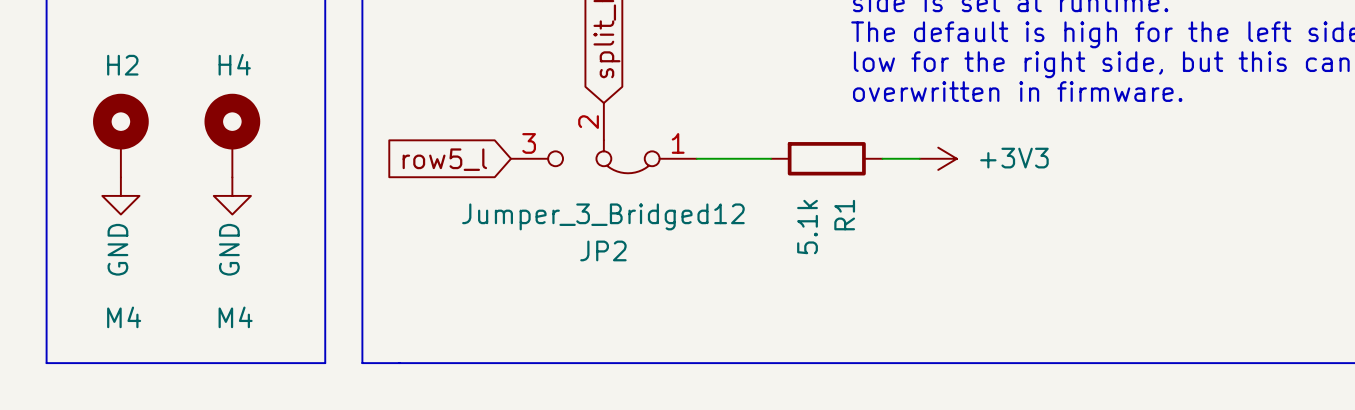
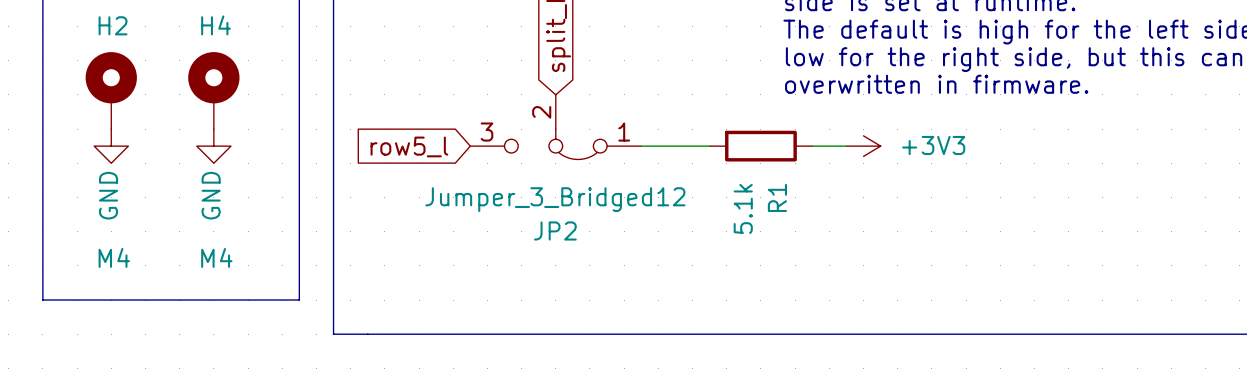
H2 position: (120, 135) -> (111, 90)
H4 position: (232, 135) -> (213, 90)
power symbol position: GND (120, 195) -> GND (111, 146)
power symbol position: GND (232, 195) -> GND (213, 146)
line: (46, 325) (46, 363) (325, 363) (325, 325) -> (42, 300) (299, 300)

